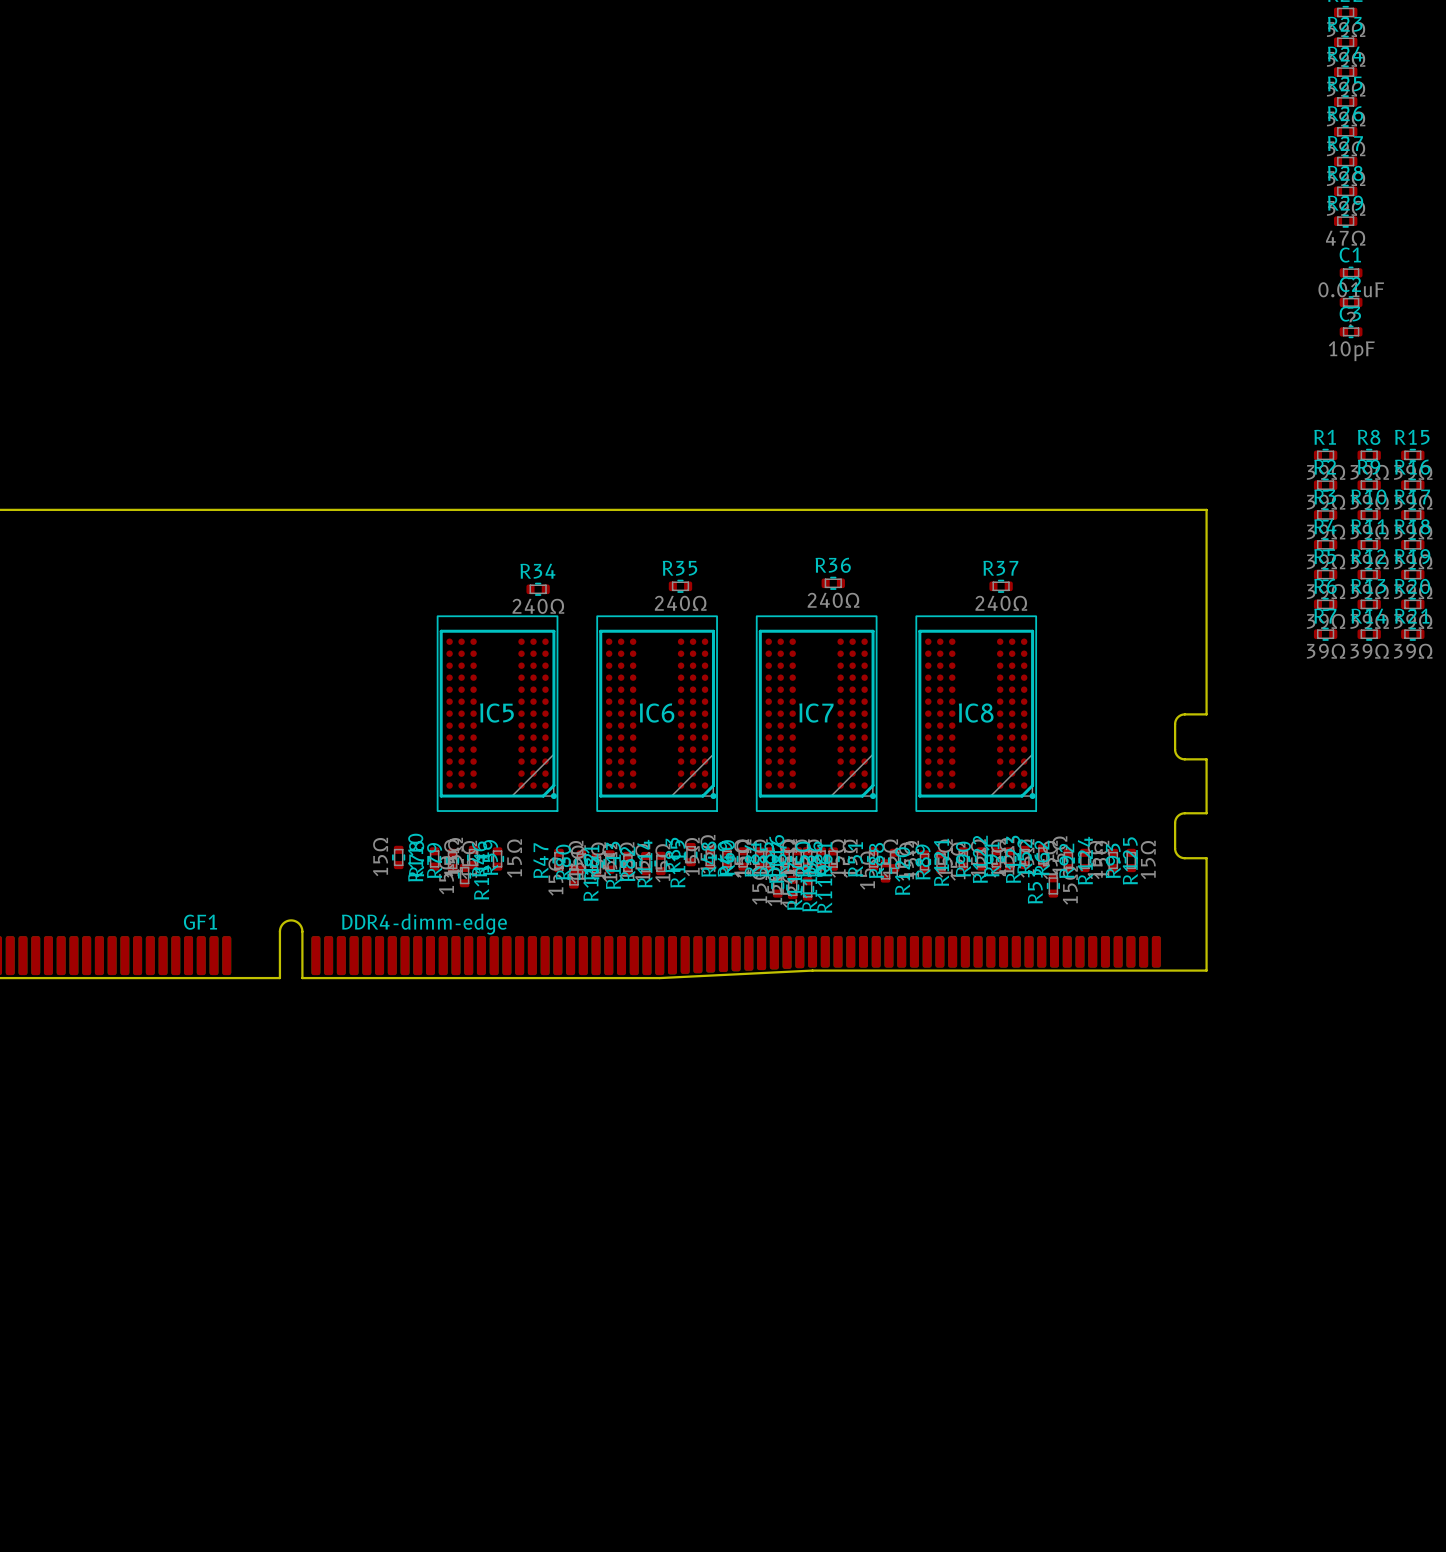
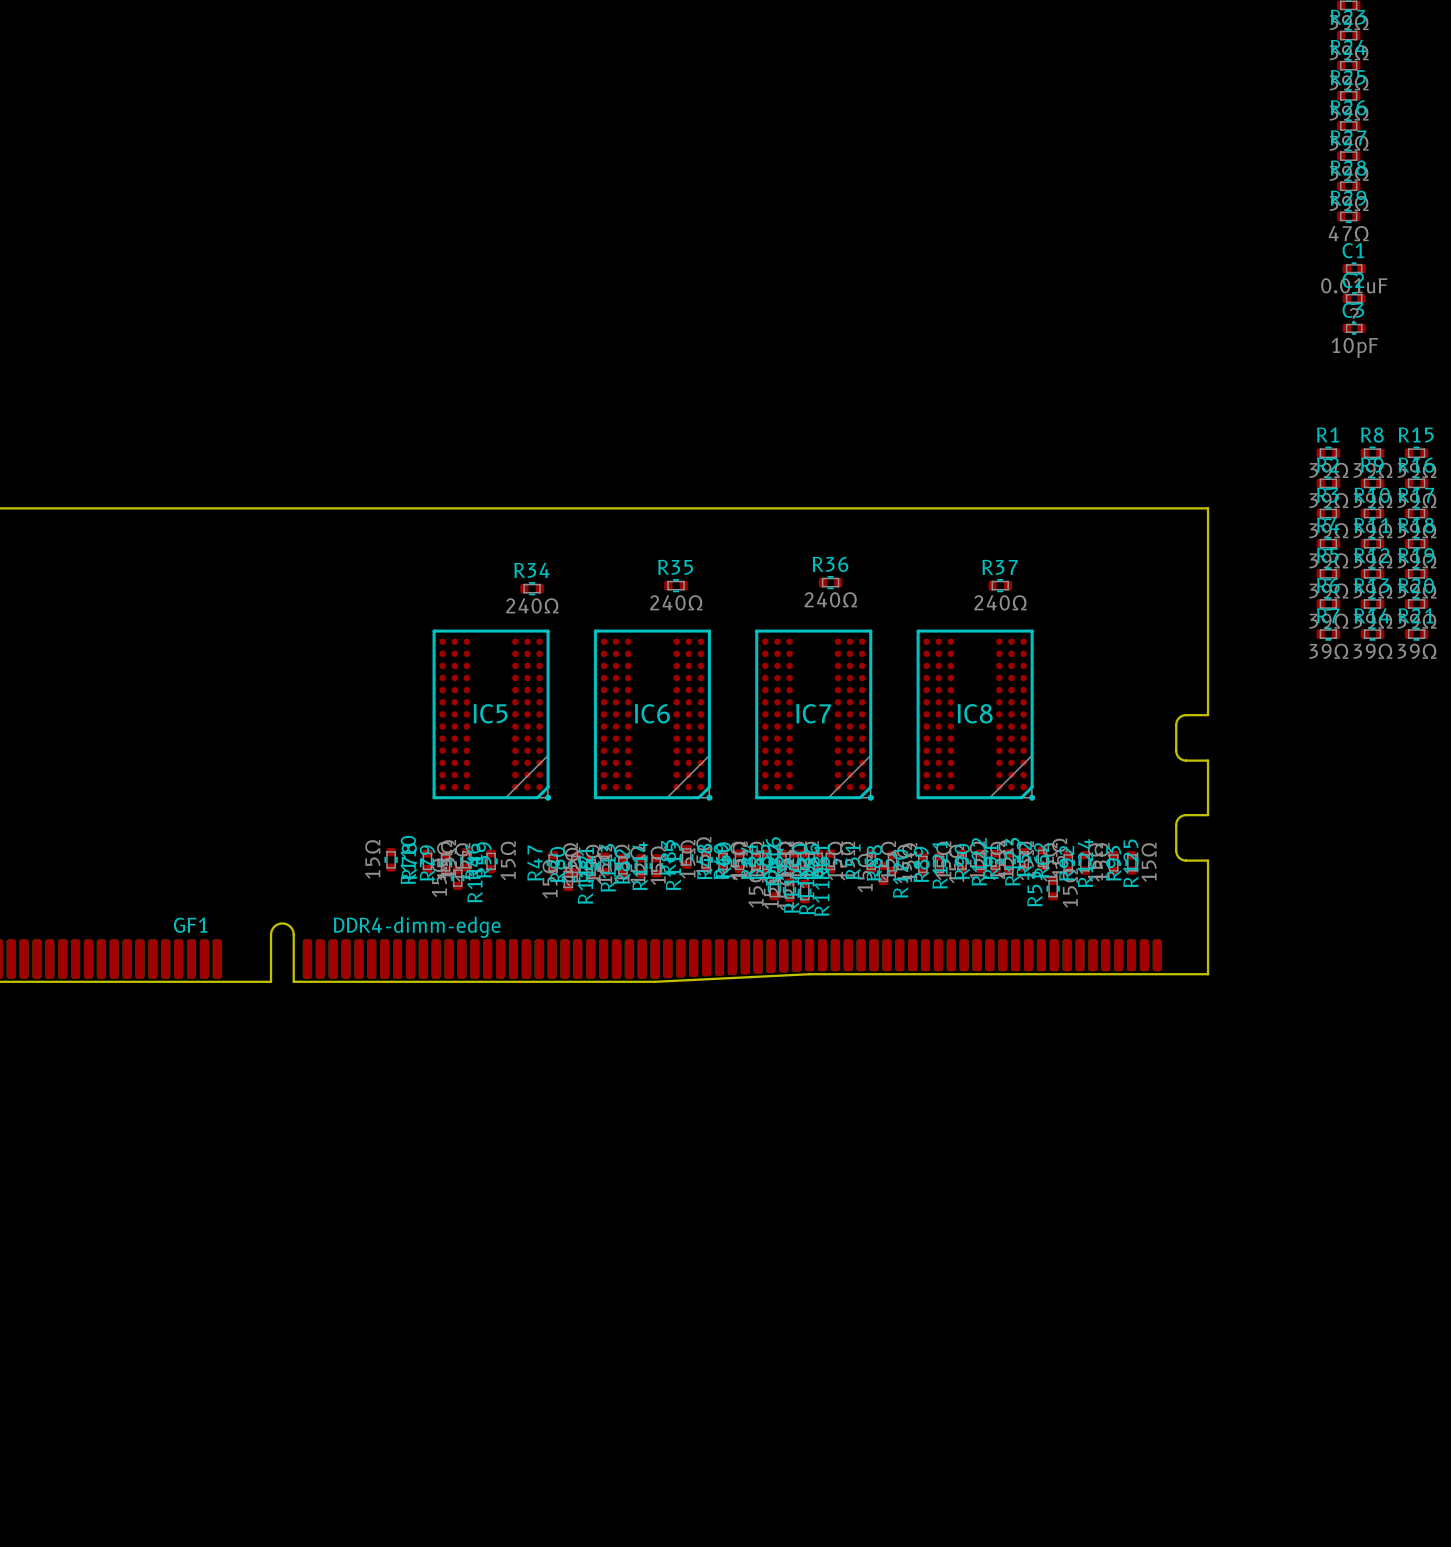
IC5 footprint: [436, 615, 559, 812] -> [432, 629, 552, 801]
IC6 footprint: [596, 615, 718, 812] -> [593, 629, 713, 801]
IC7 footprint: [755, 615, 878, 812] -> [755, 629, 874, 801]
IC8 footprint: [915, 615, 1038, 812] -> [916, 629, 1036, 801]

